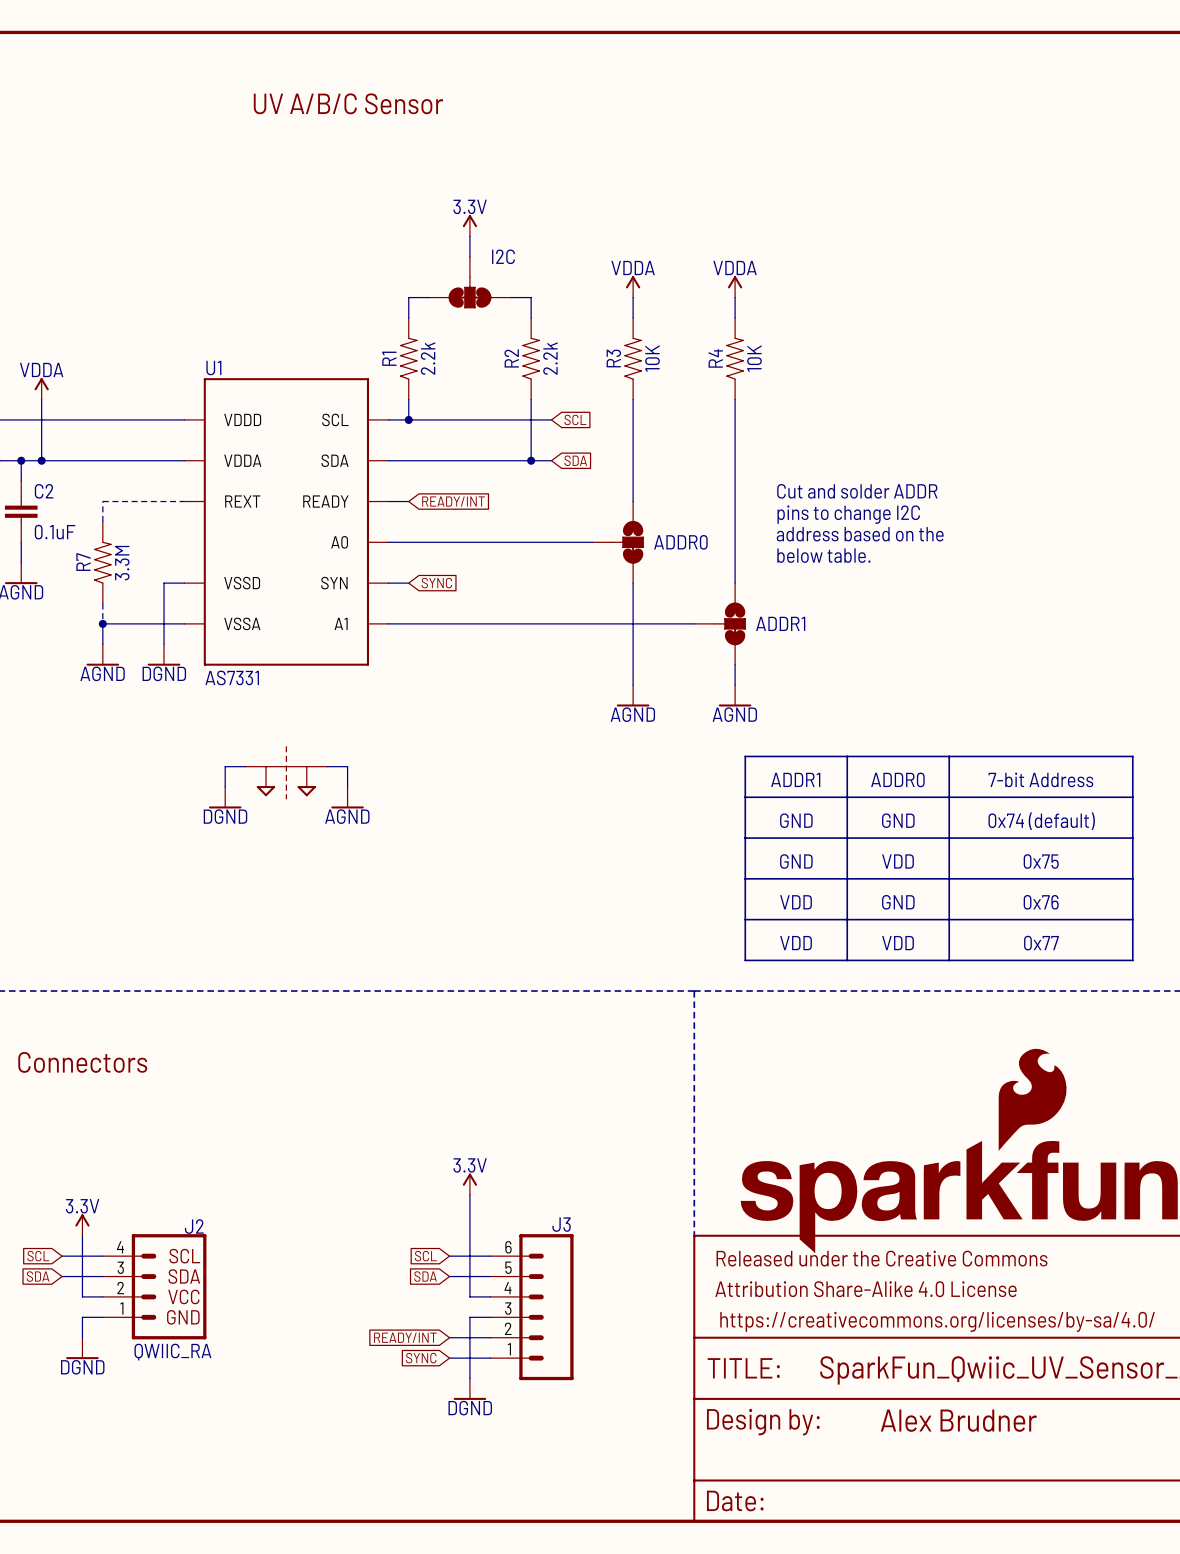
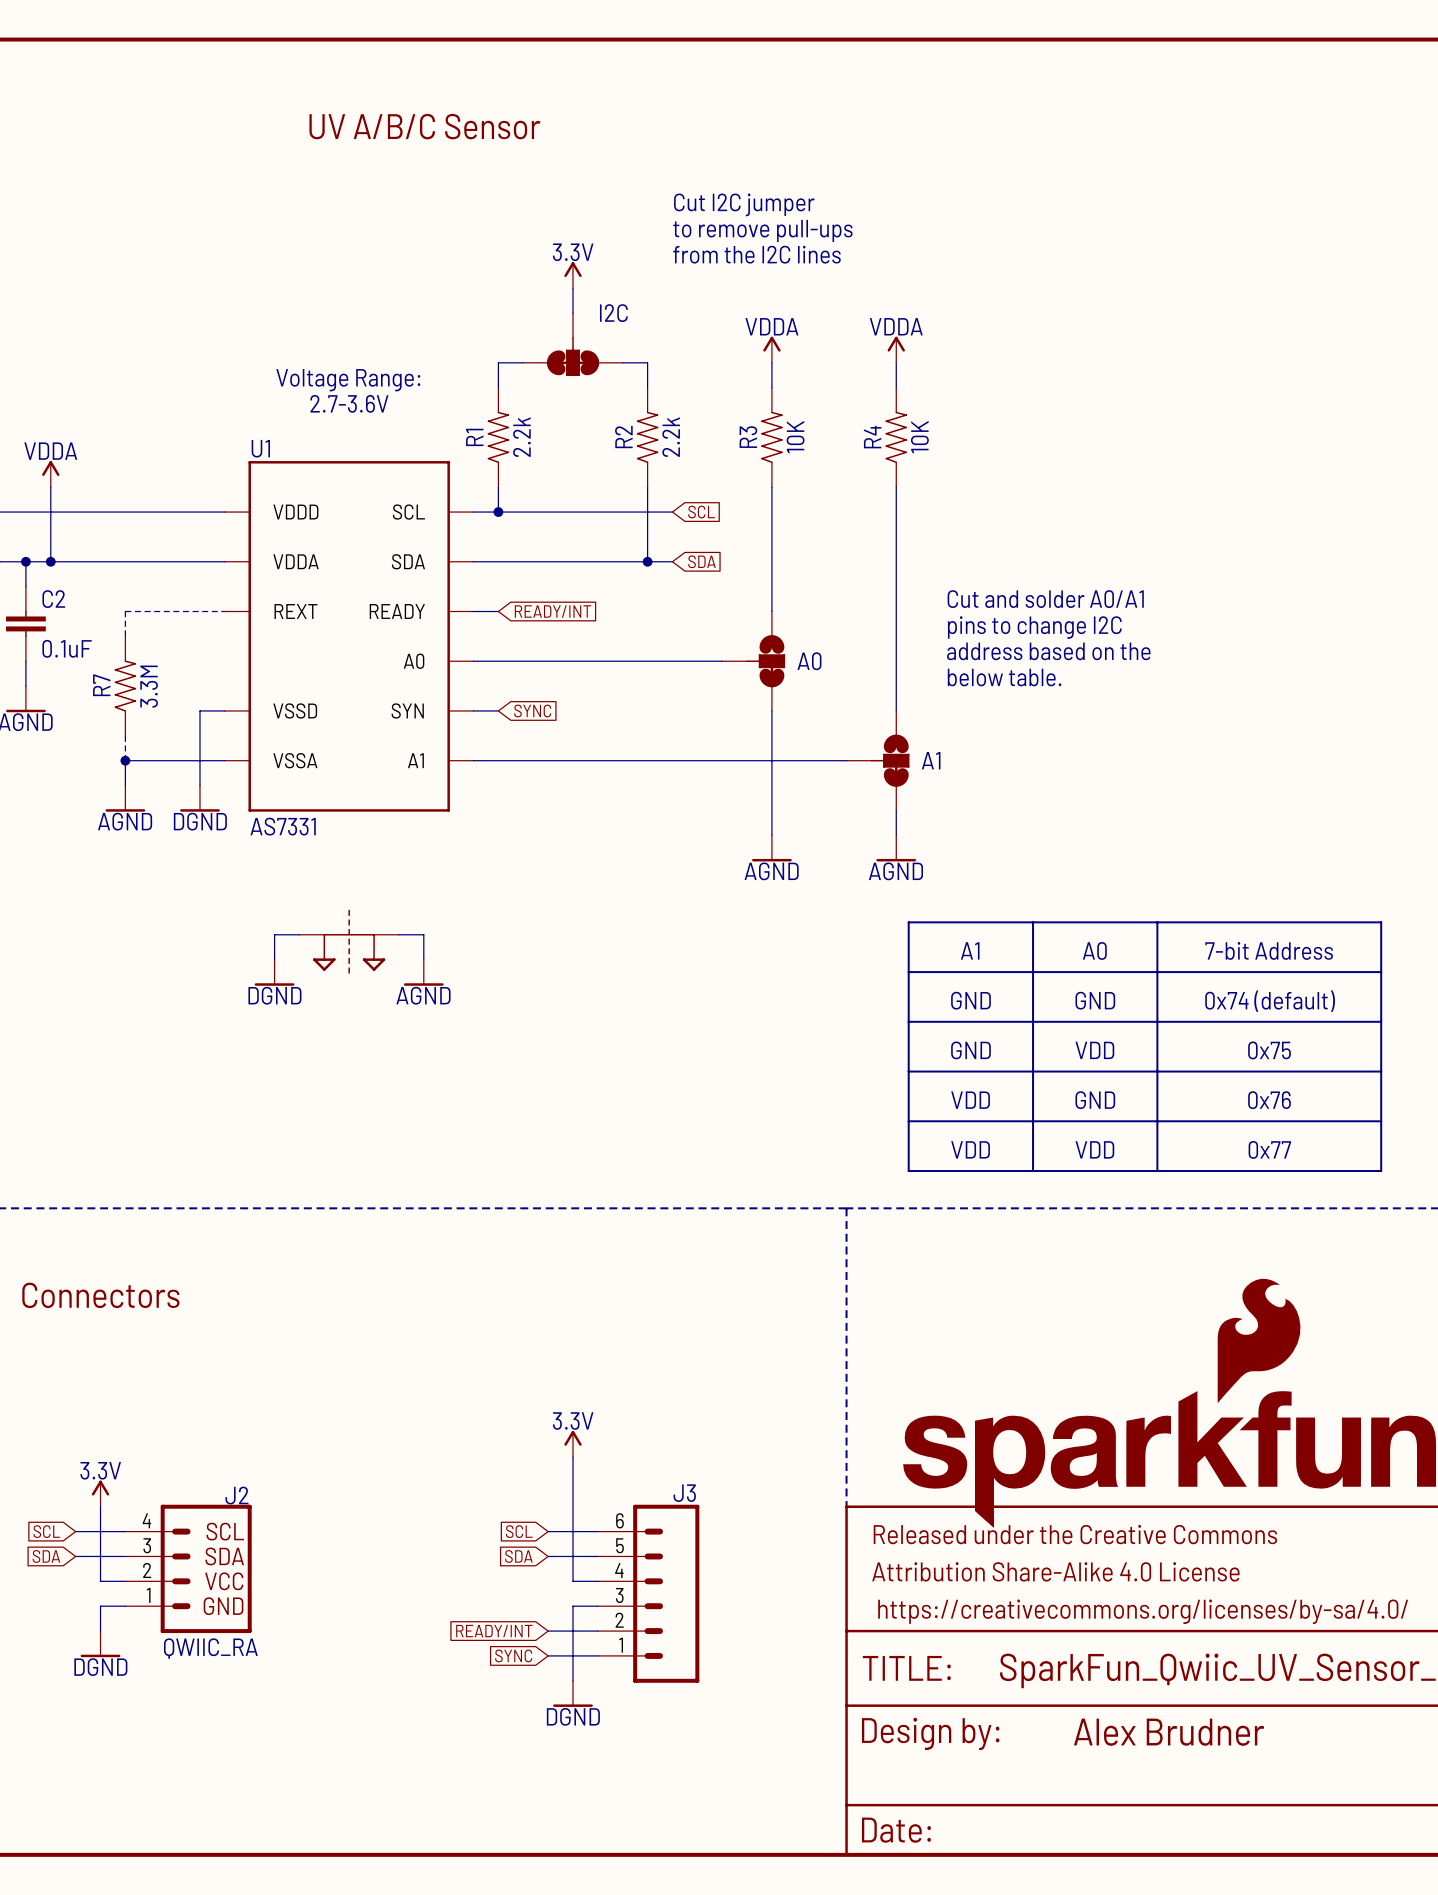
text: none -> Cut I2C jumper (744, 204)
text: none -> to remove pull-ups (762, 230)
text: none -> from the I2C lines (756, 254)
text: none -> Voltage Range: (348, 380)
text: none -> 2.7-3.6V (349, 403)
text: Cut and solder ADDR (857, 491) -> Cut and solder A0/A1 (1045, 599)
ADDR0 name: ADDR0 (680, 542) -> A0 (809, 661)
ADDR1 name: ADDR1 (780, 623) -> A1 (931, 760)
text: ADDR1 (795, 779) -> A1 (970, 950)
text: ADDR0 (897, 779) -> A0 (1094, 950)

